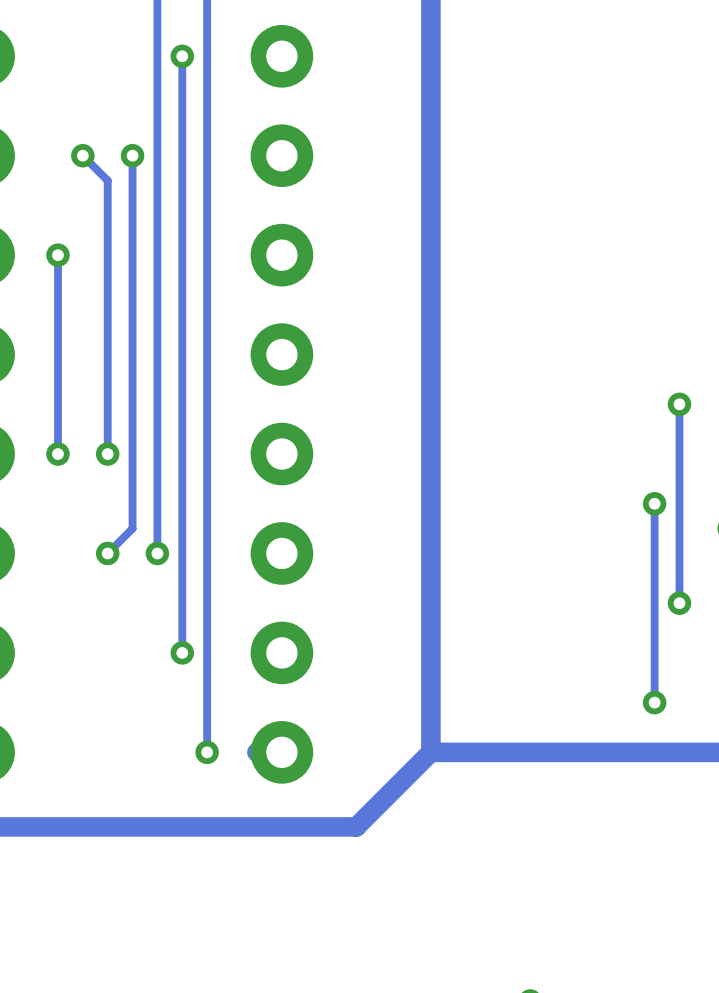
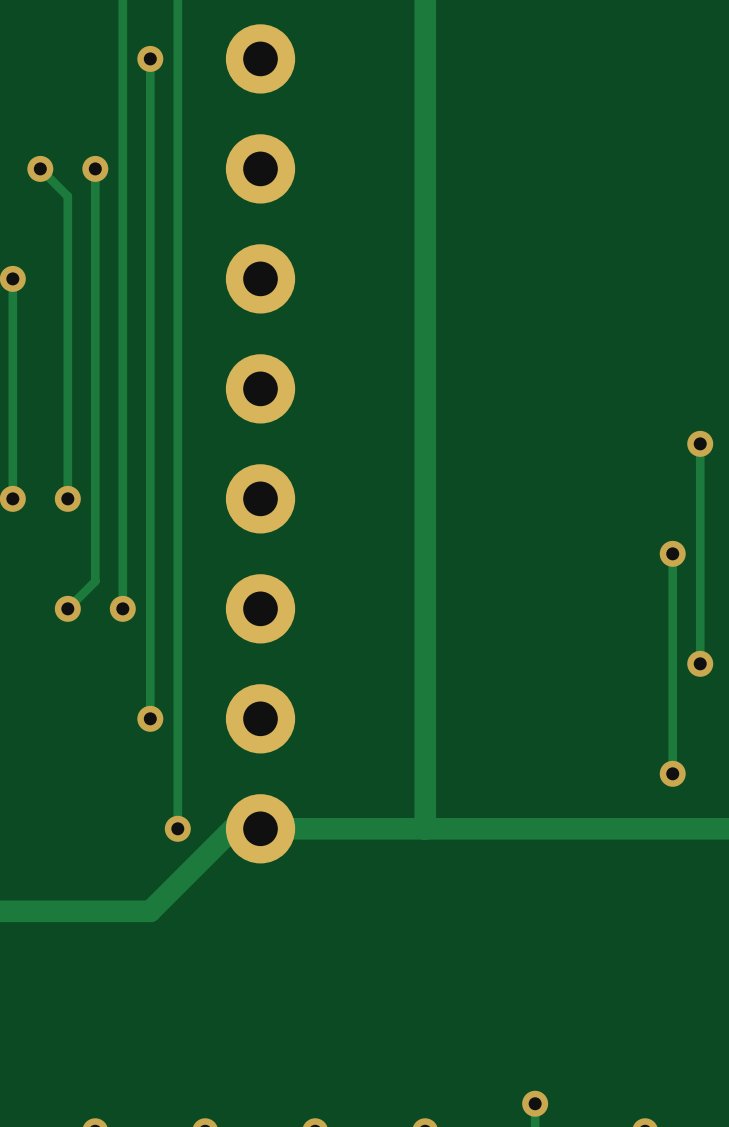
track: none -> (232, 828) (150, 911)
track: (430, 752) (356, 826) (182, 826) -> (425, 828) (260, 828)

